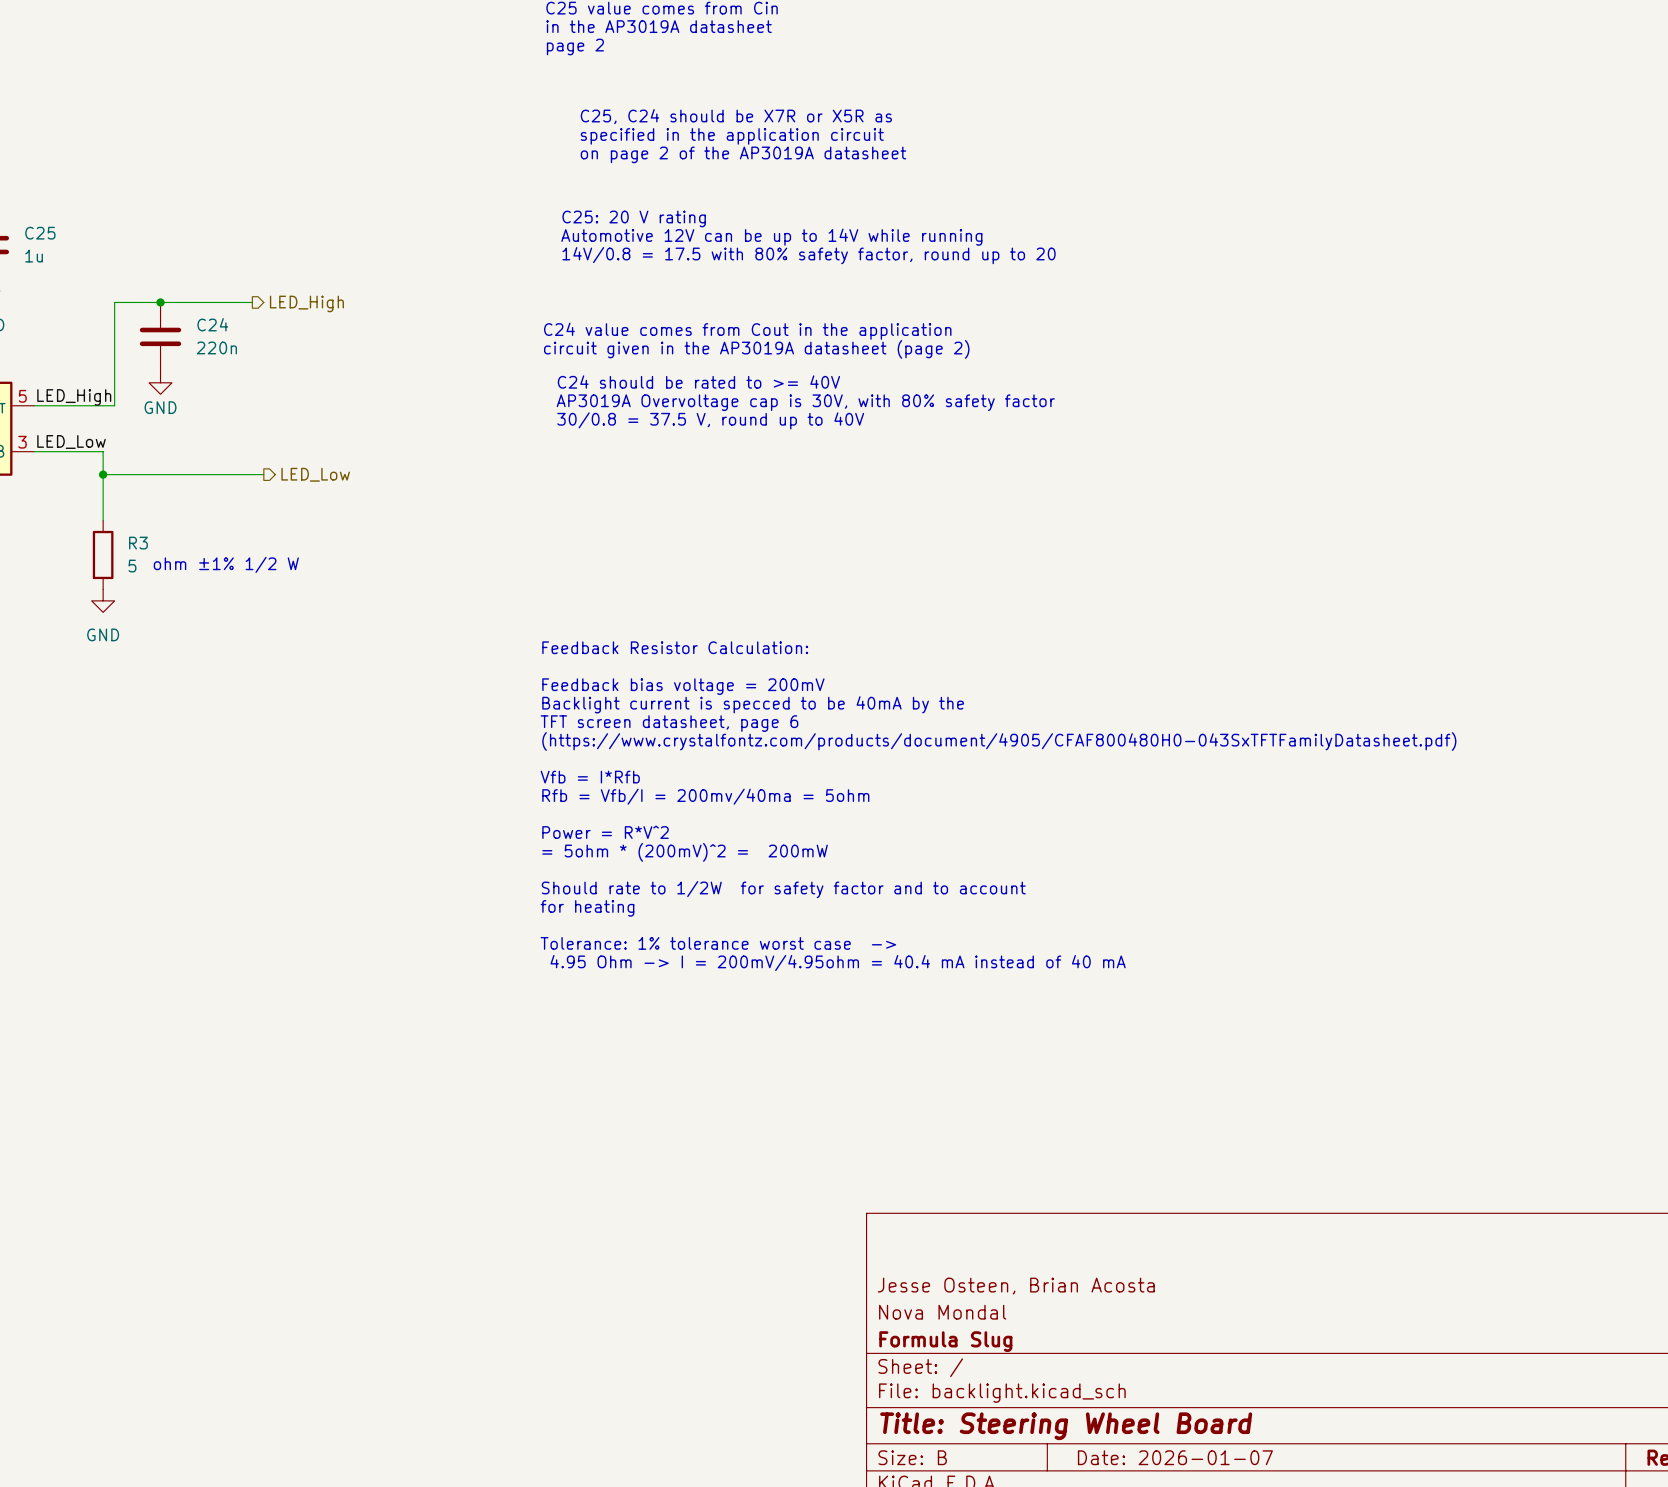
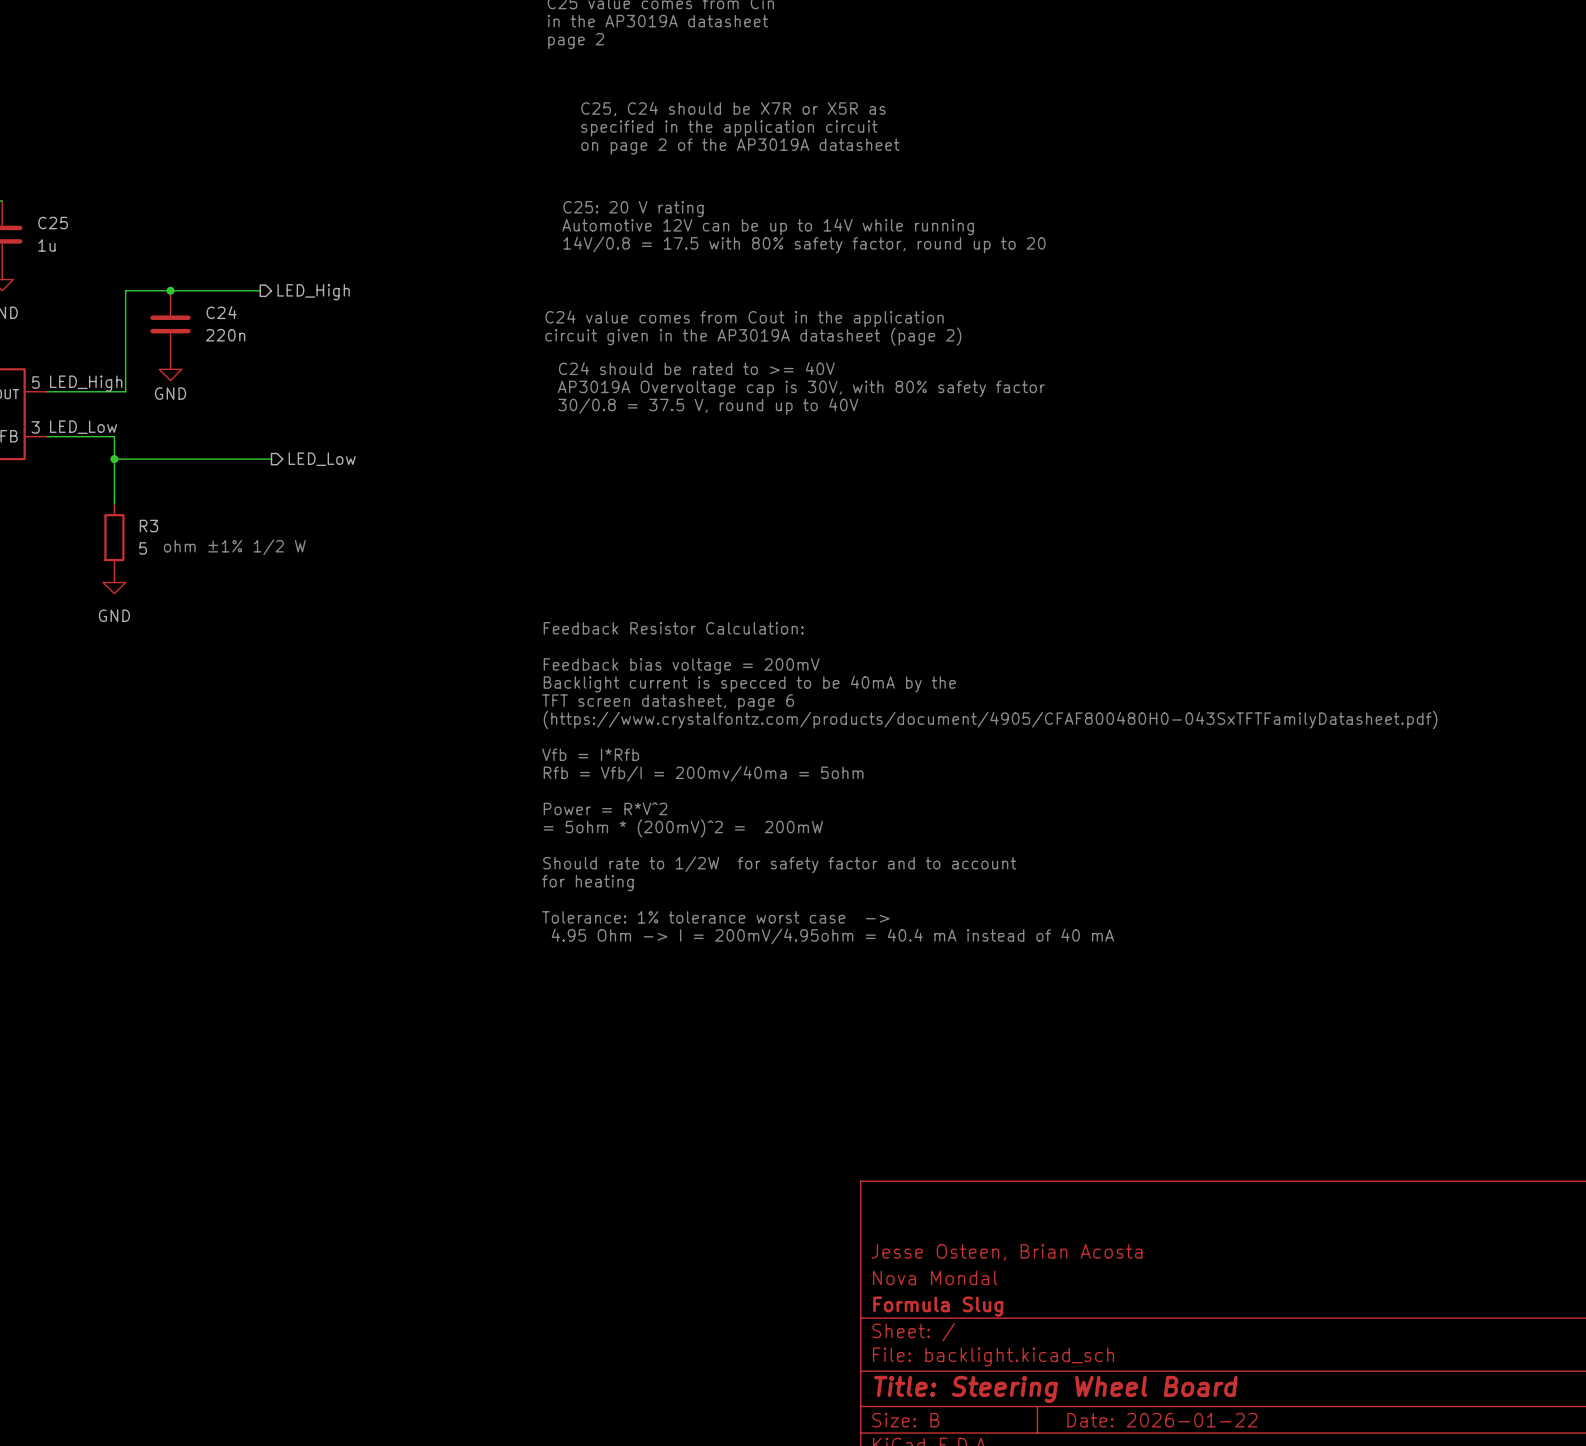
title block: Date: 2026-01-07 (1175, 1457) -> Date: 2026-01-22 (1162, 1420)

